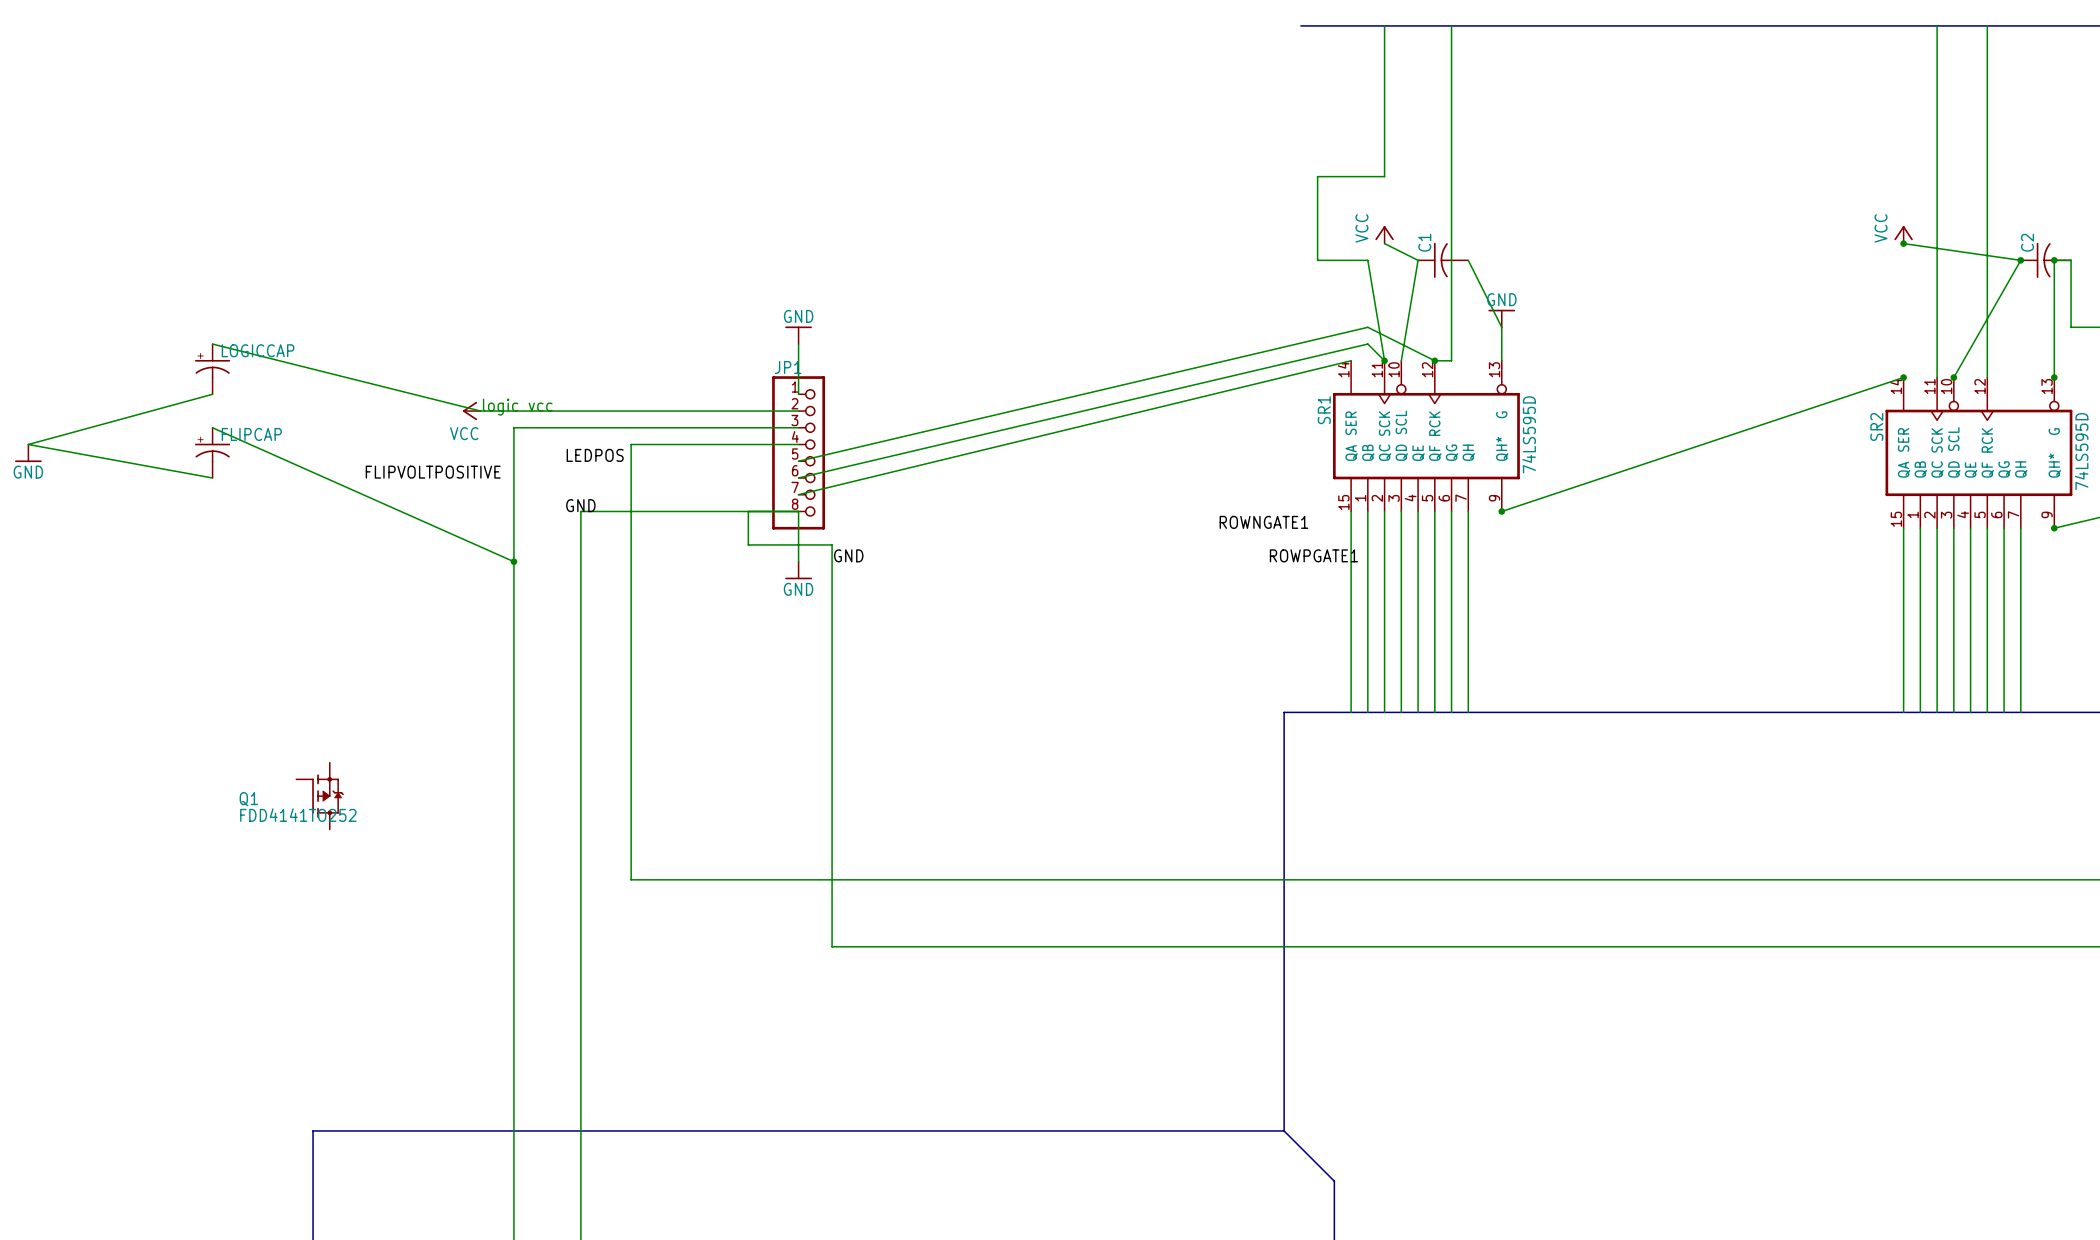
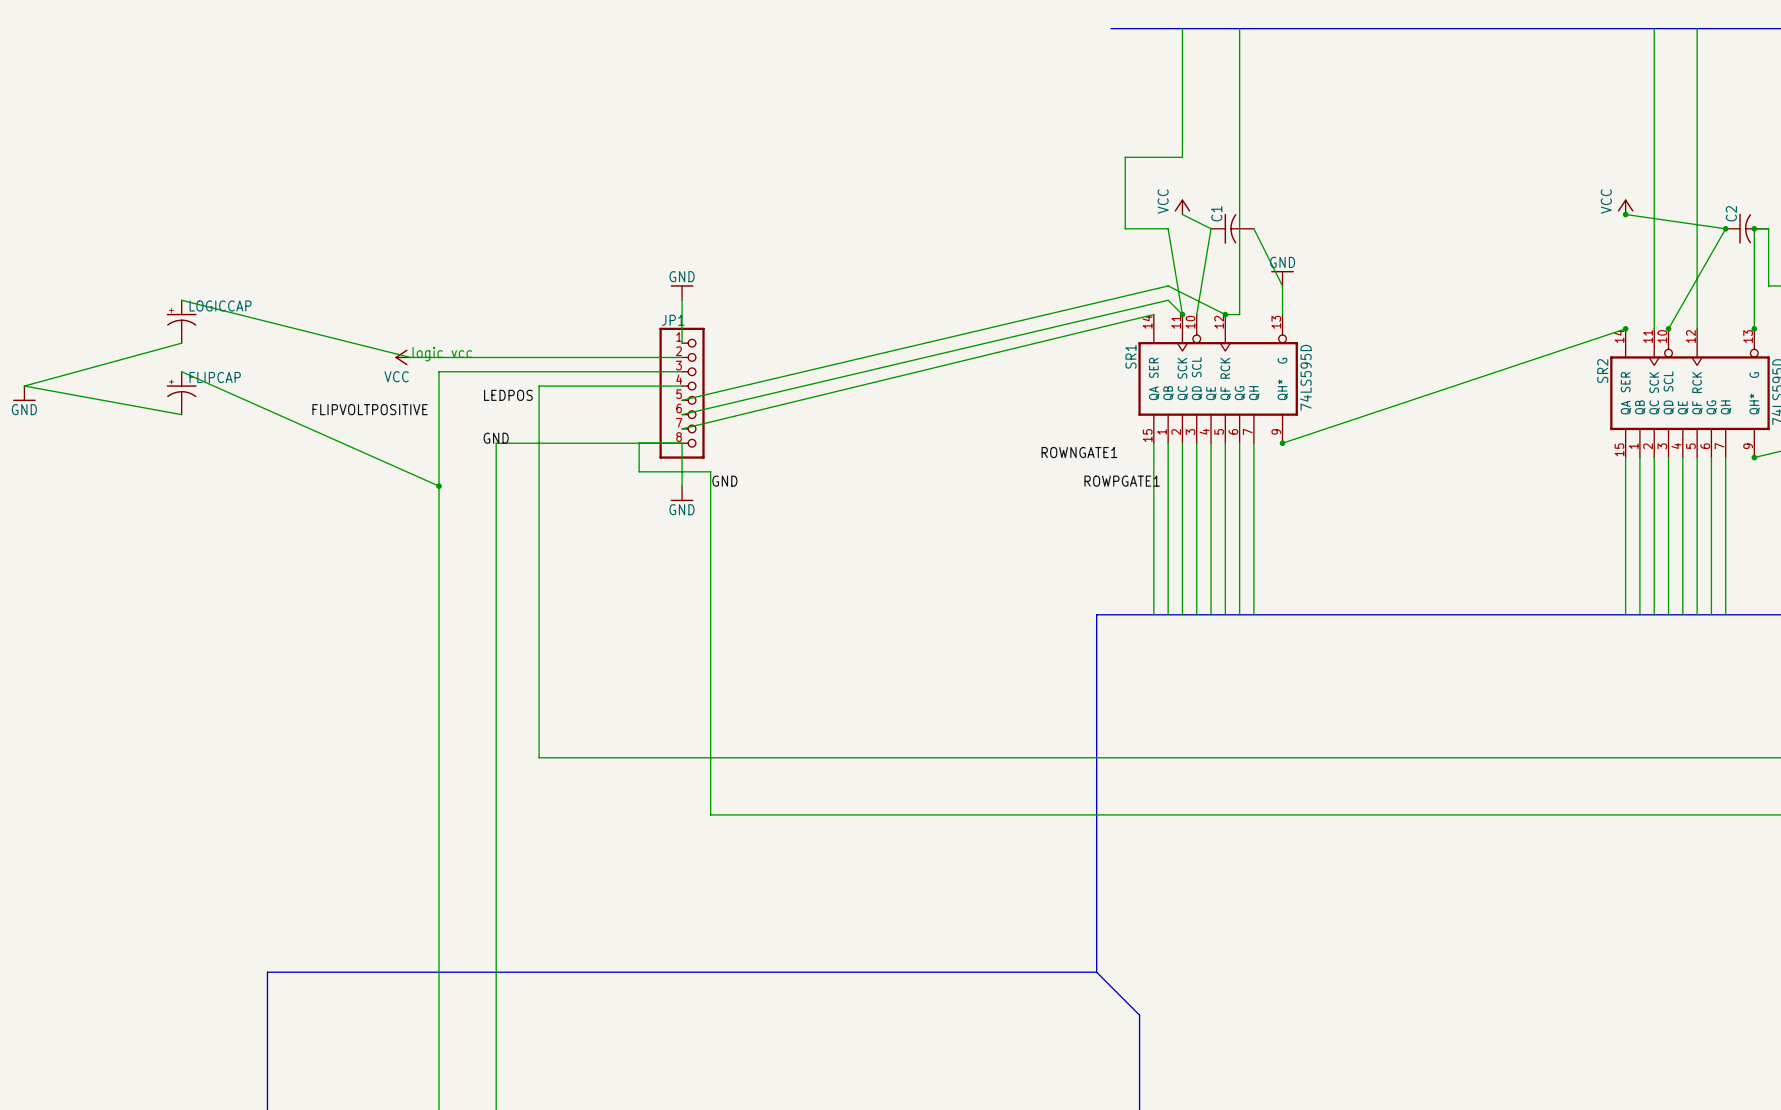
Q1: FDD4141TO252 (319, 796) -> none

